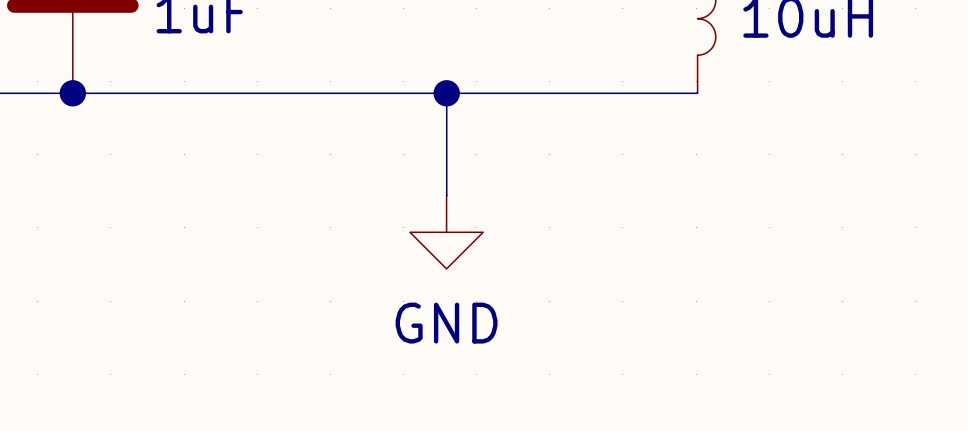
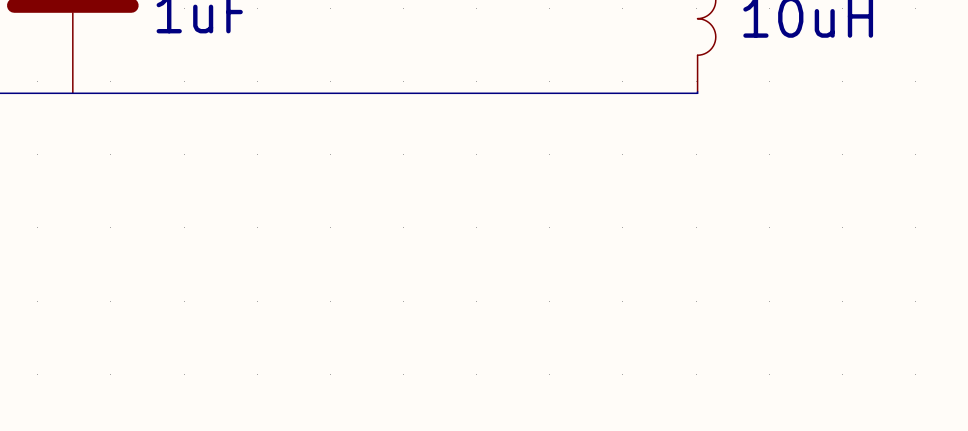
junction: (72, 93) -> none
wire: (446, 93) (446, 195) -> none
junction: (446, 93) -> none
power symbol: GND (446, 232) -> none

